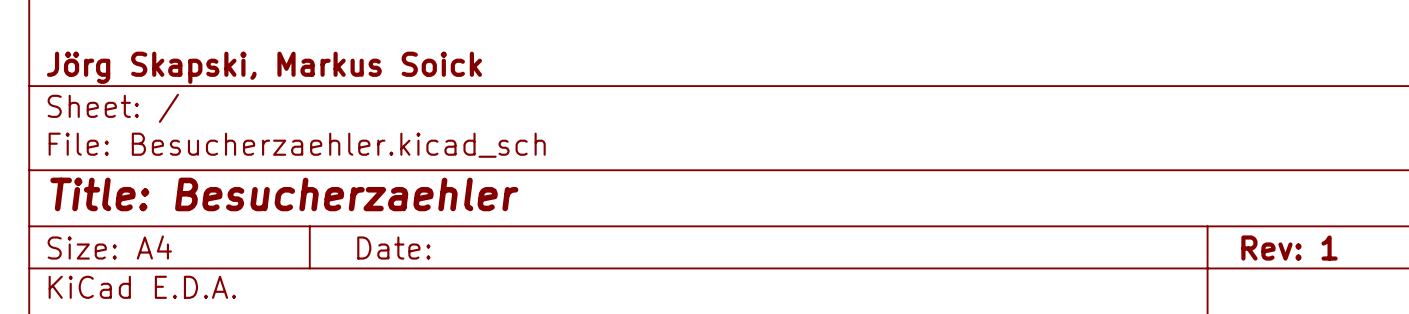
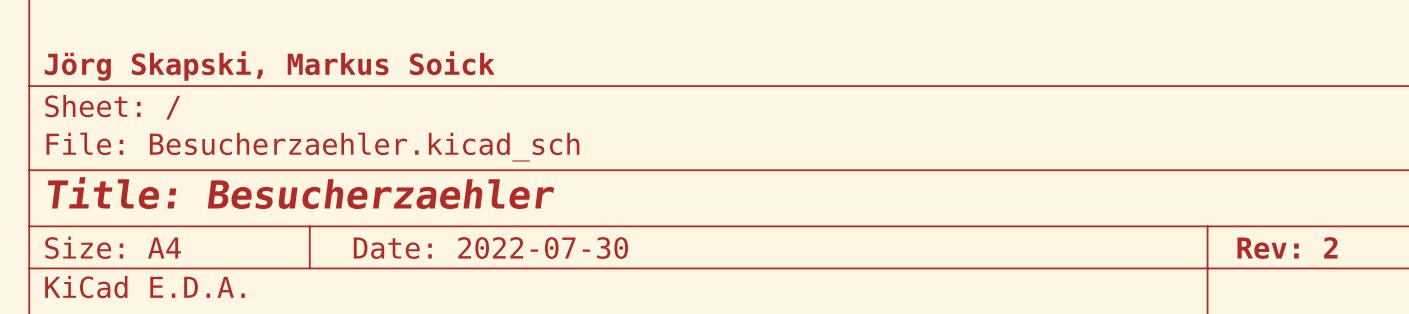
title block: Date: (393, 248) -> Date: 2022-07-30 (490, 248)
title block: Rev: 1 (1289, 248) -> Rev: 2 (1287, 248)

